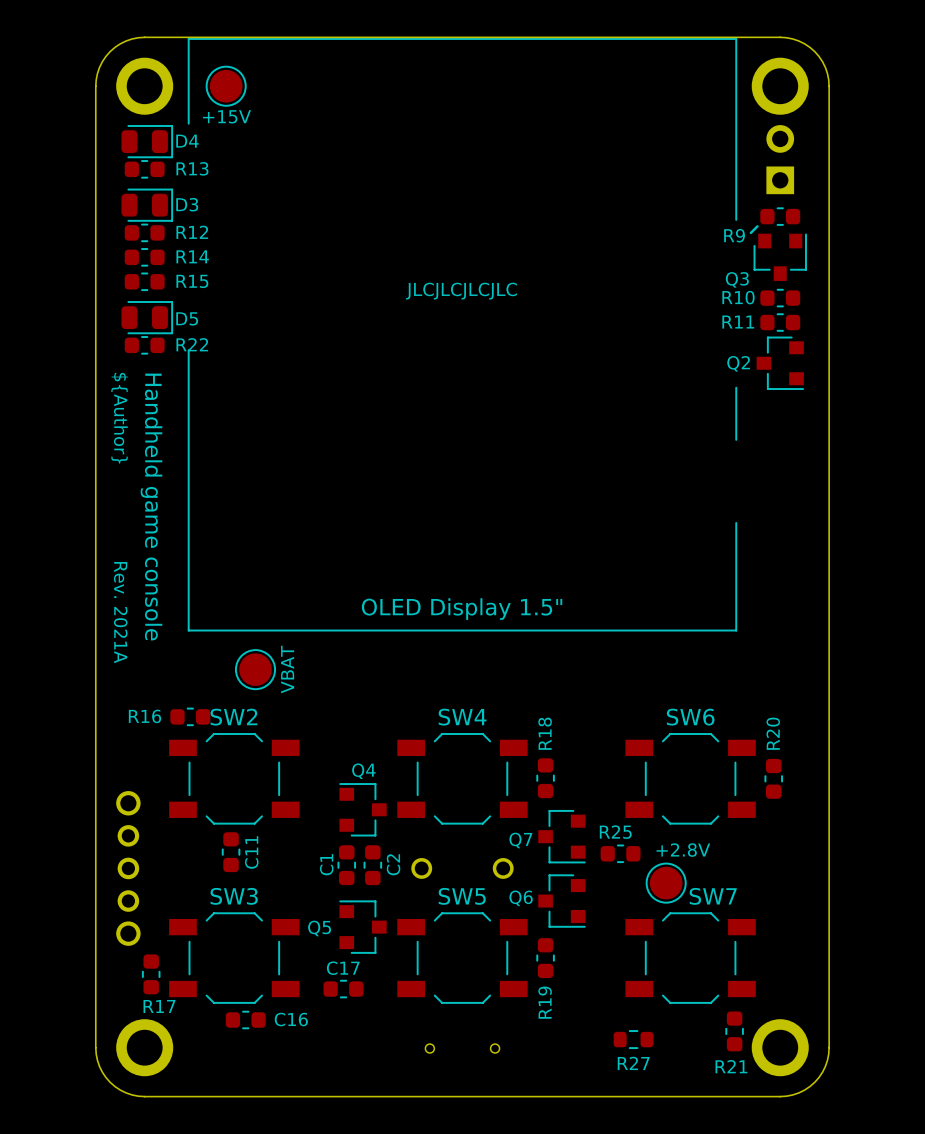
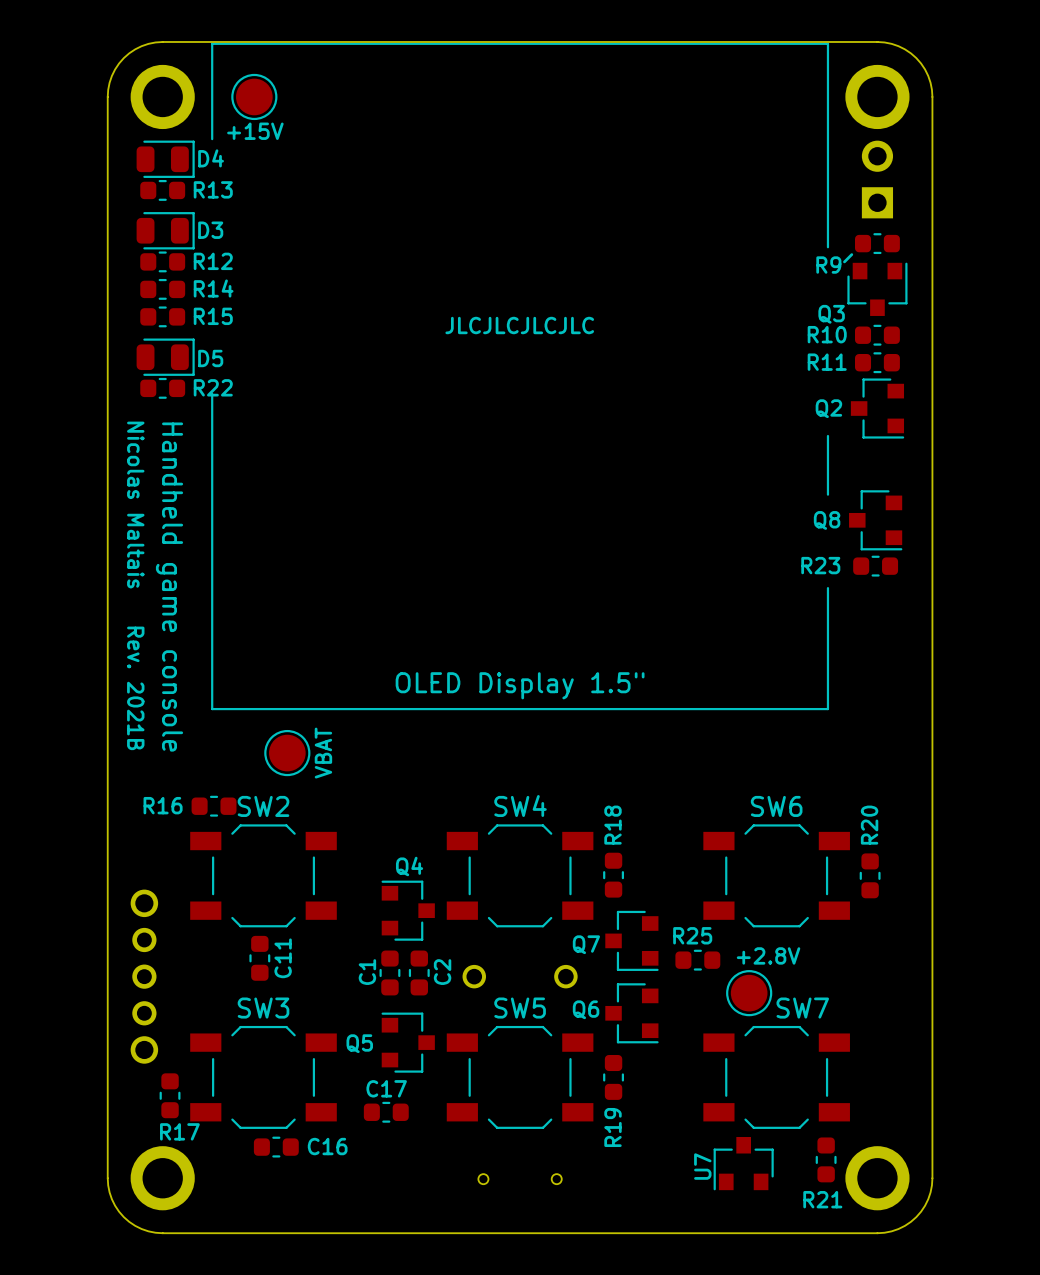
text: ${Author} (119, 418) -> Nicolas Maltais (135, 505)
Q8: none -> (875, 520)
R23: none -> (875, 566)
text: Rev. 2021A (120, 612) -> Rev. 2021B (135, 688)
U7: none -> (743, 1163)
R27: (633, 1039) -> none

